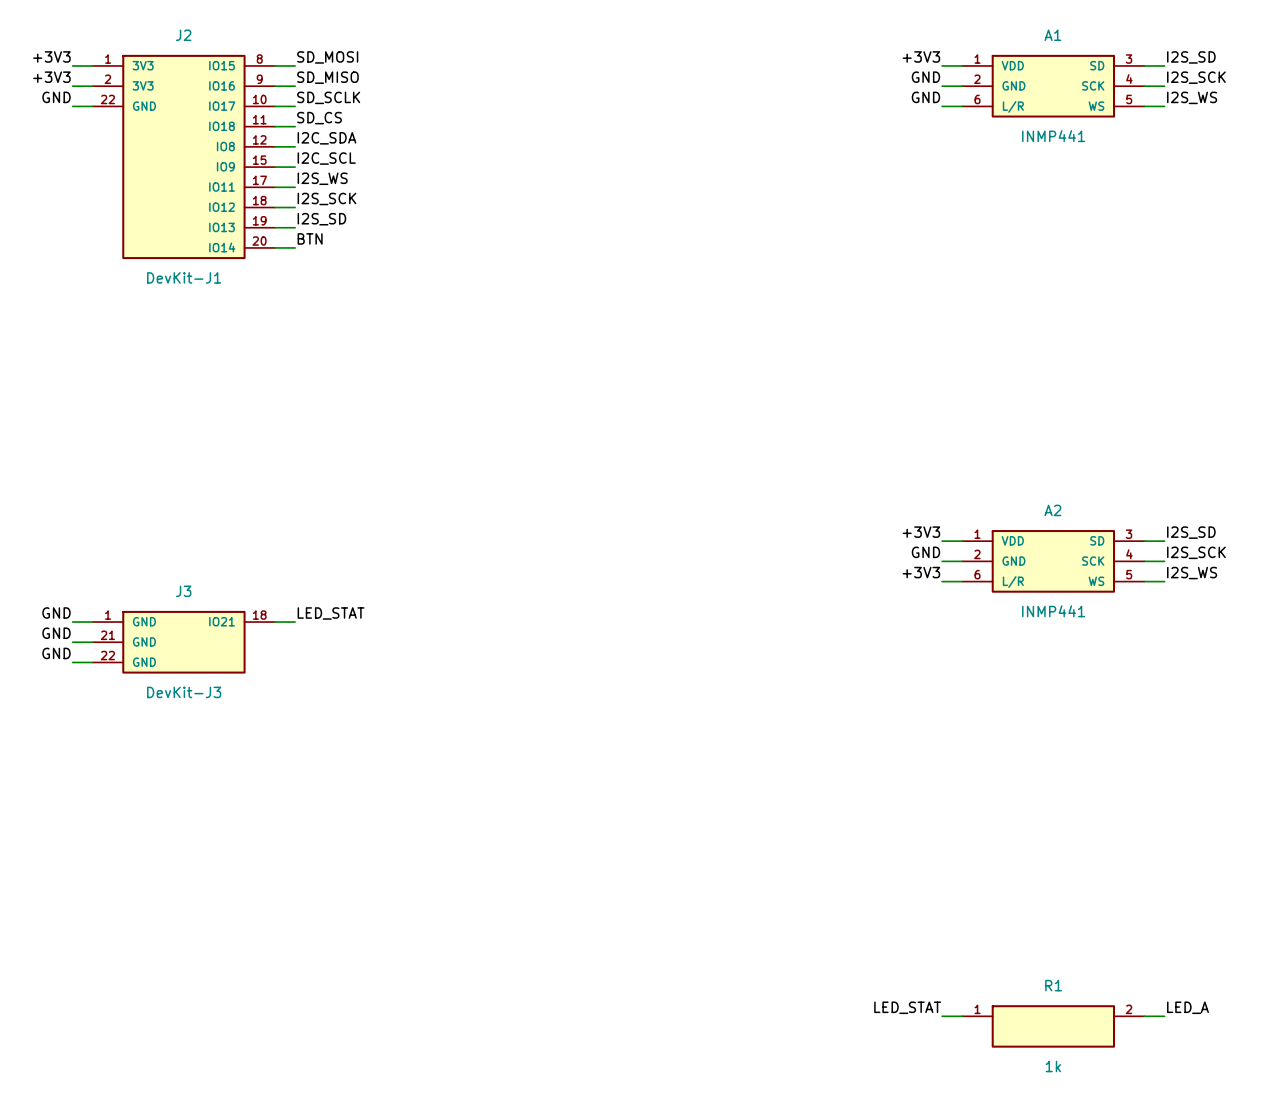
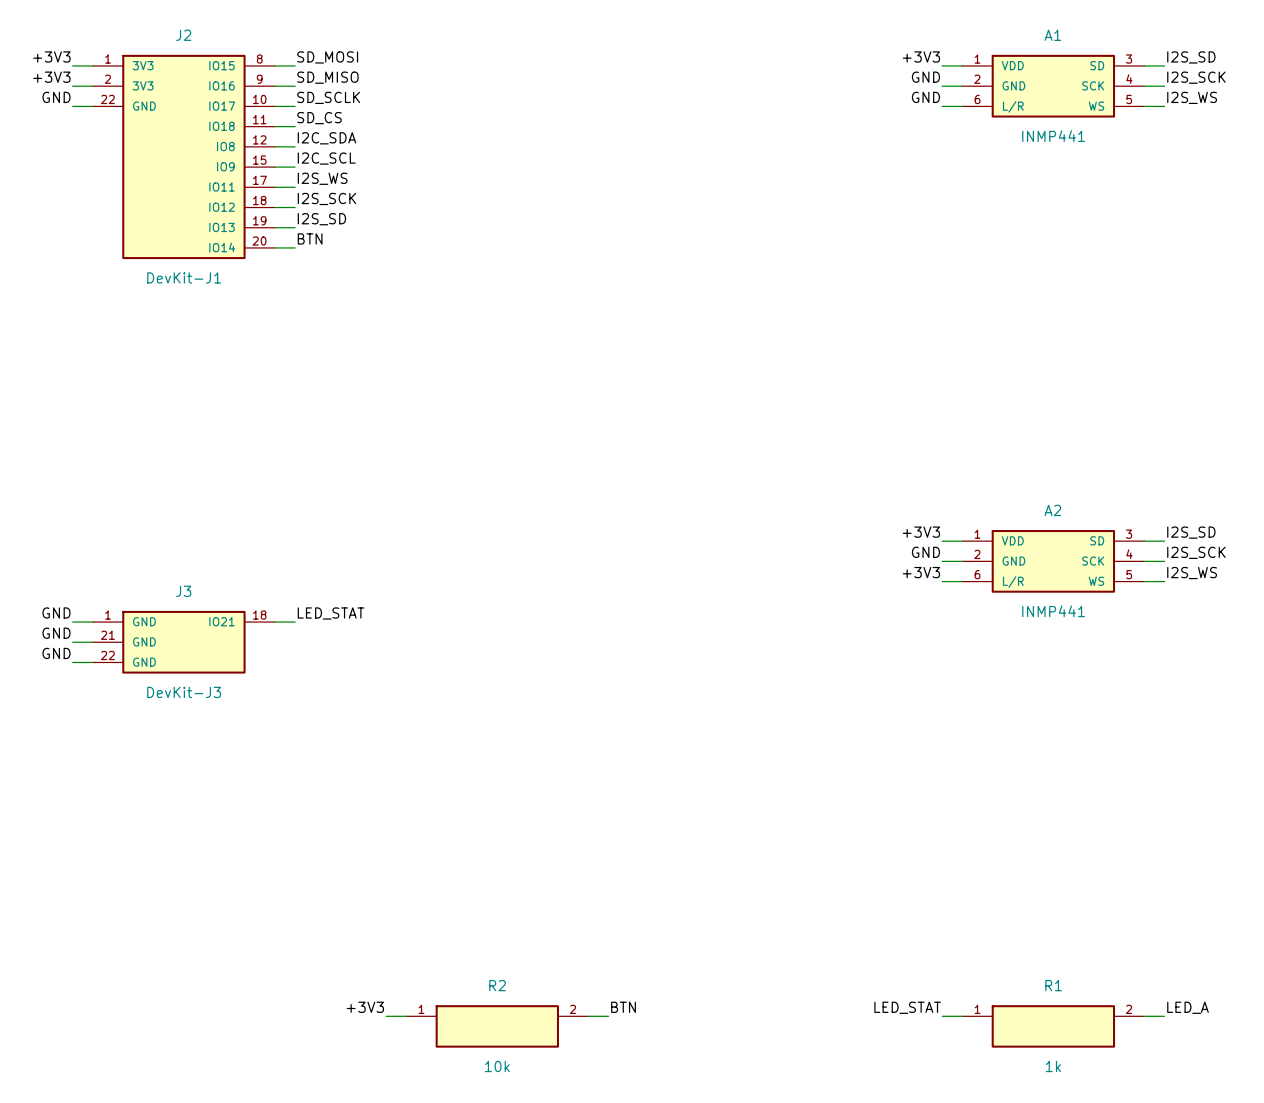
label: none -> +3V3 (365, 1007)
label: none -> BTN (623, 1007)
wire: none -> (386, 1016) (406, 1016)
wire: none -> (588, 1016) (608, 1016)
R2: none -> 10k (497, 1026)

